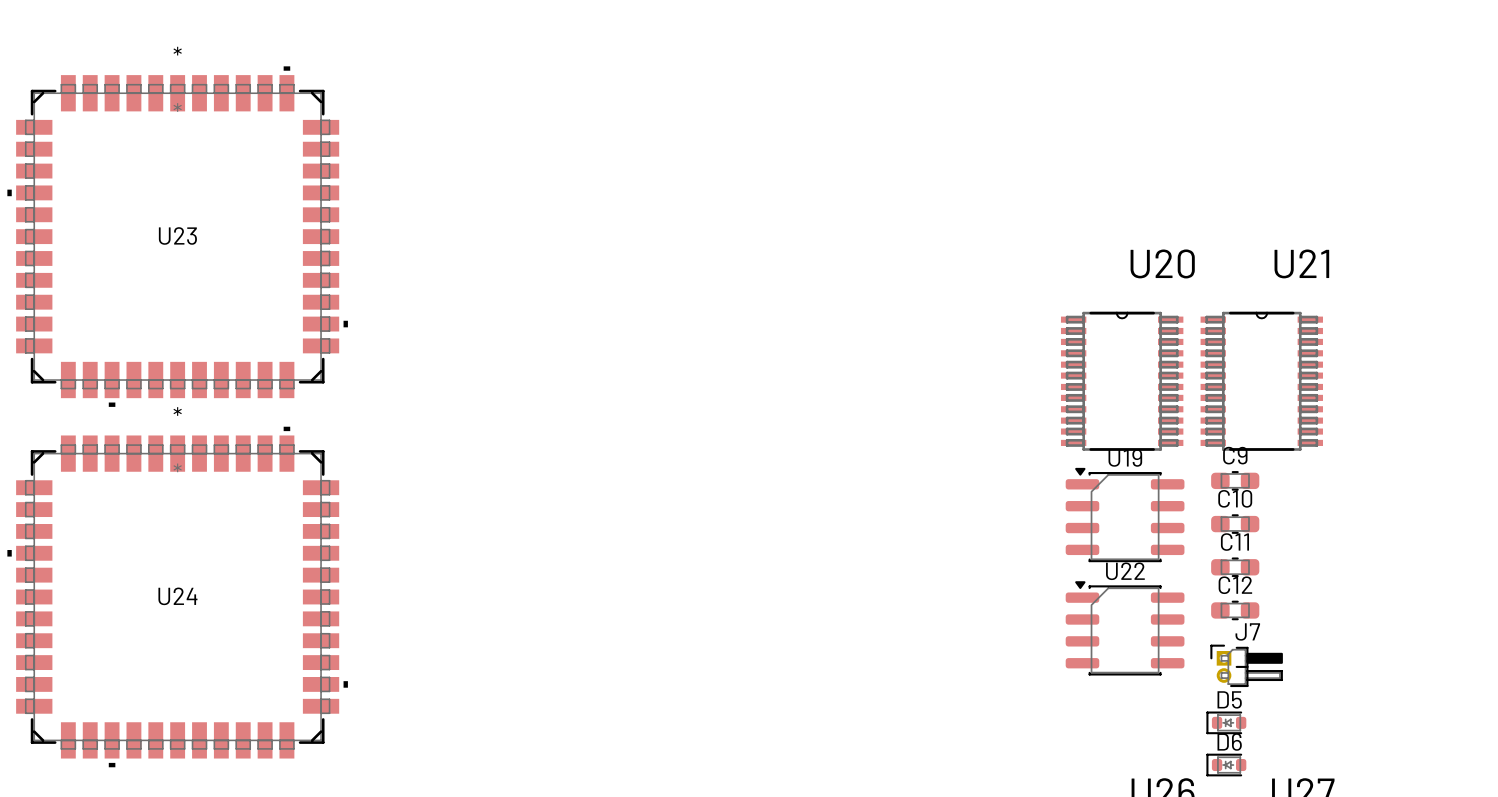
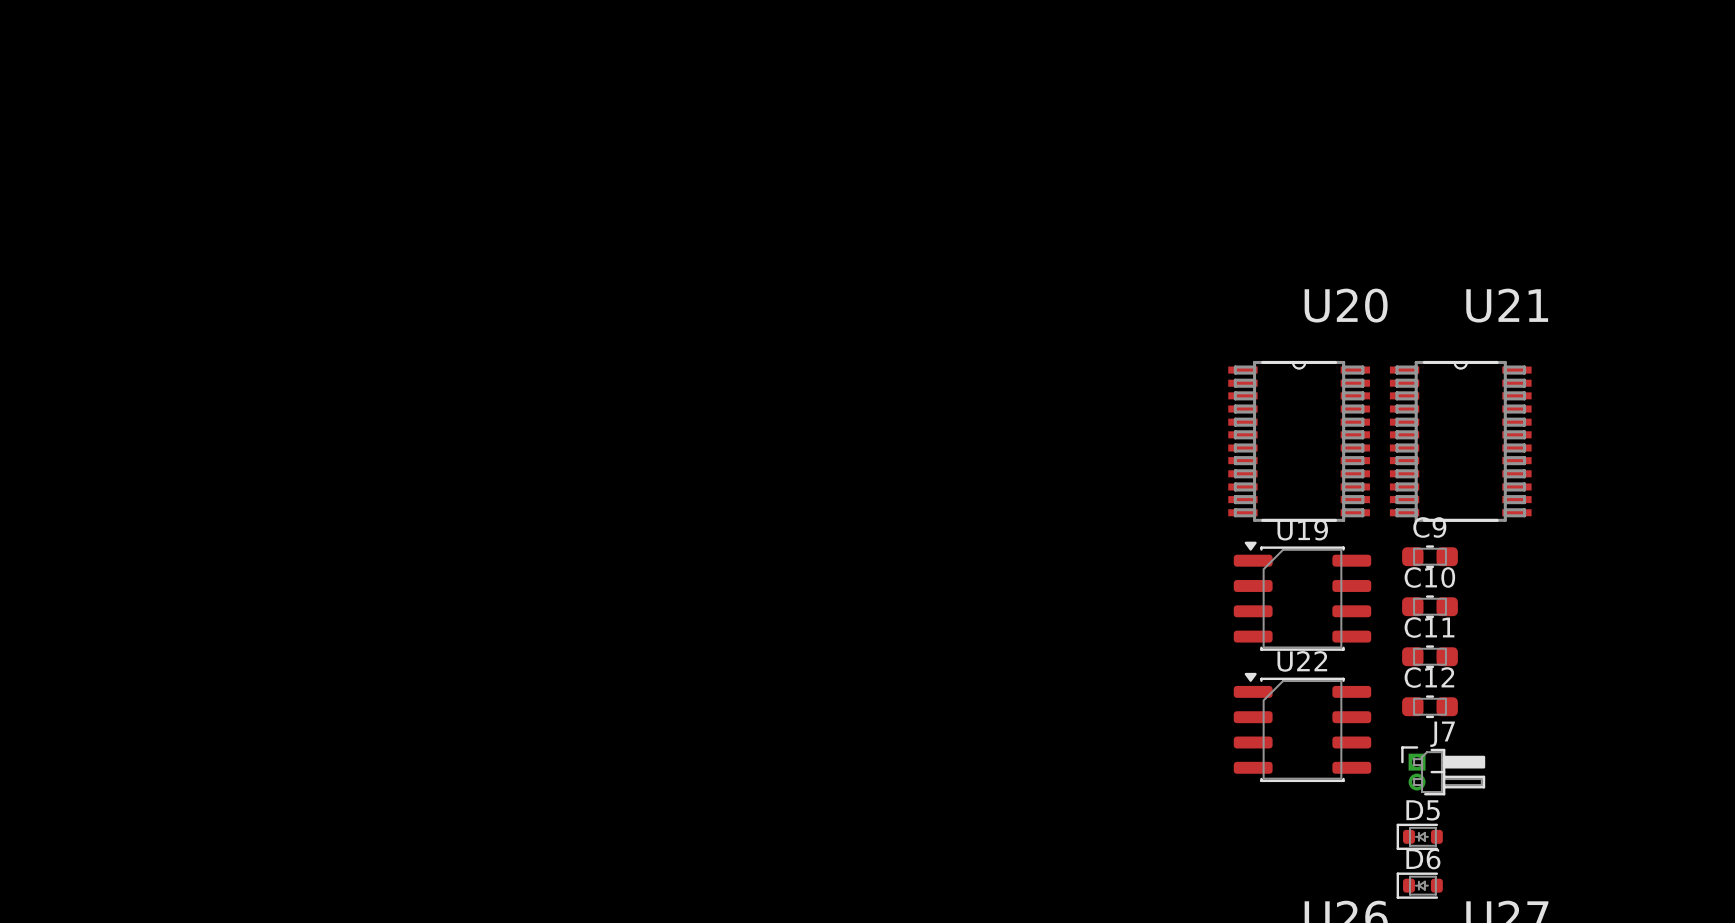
U23: (177, 236) -> none
U24: (177, 597) -> none

